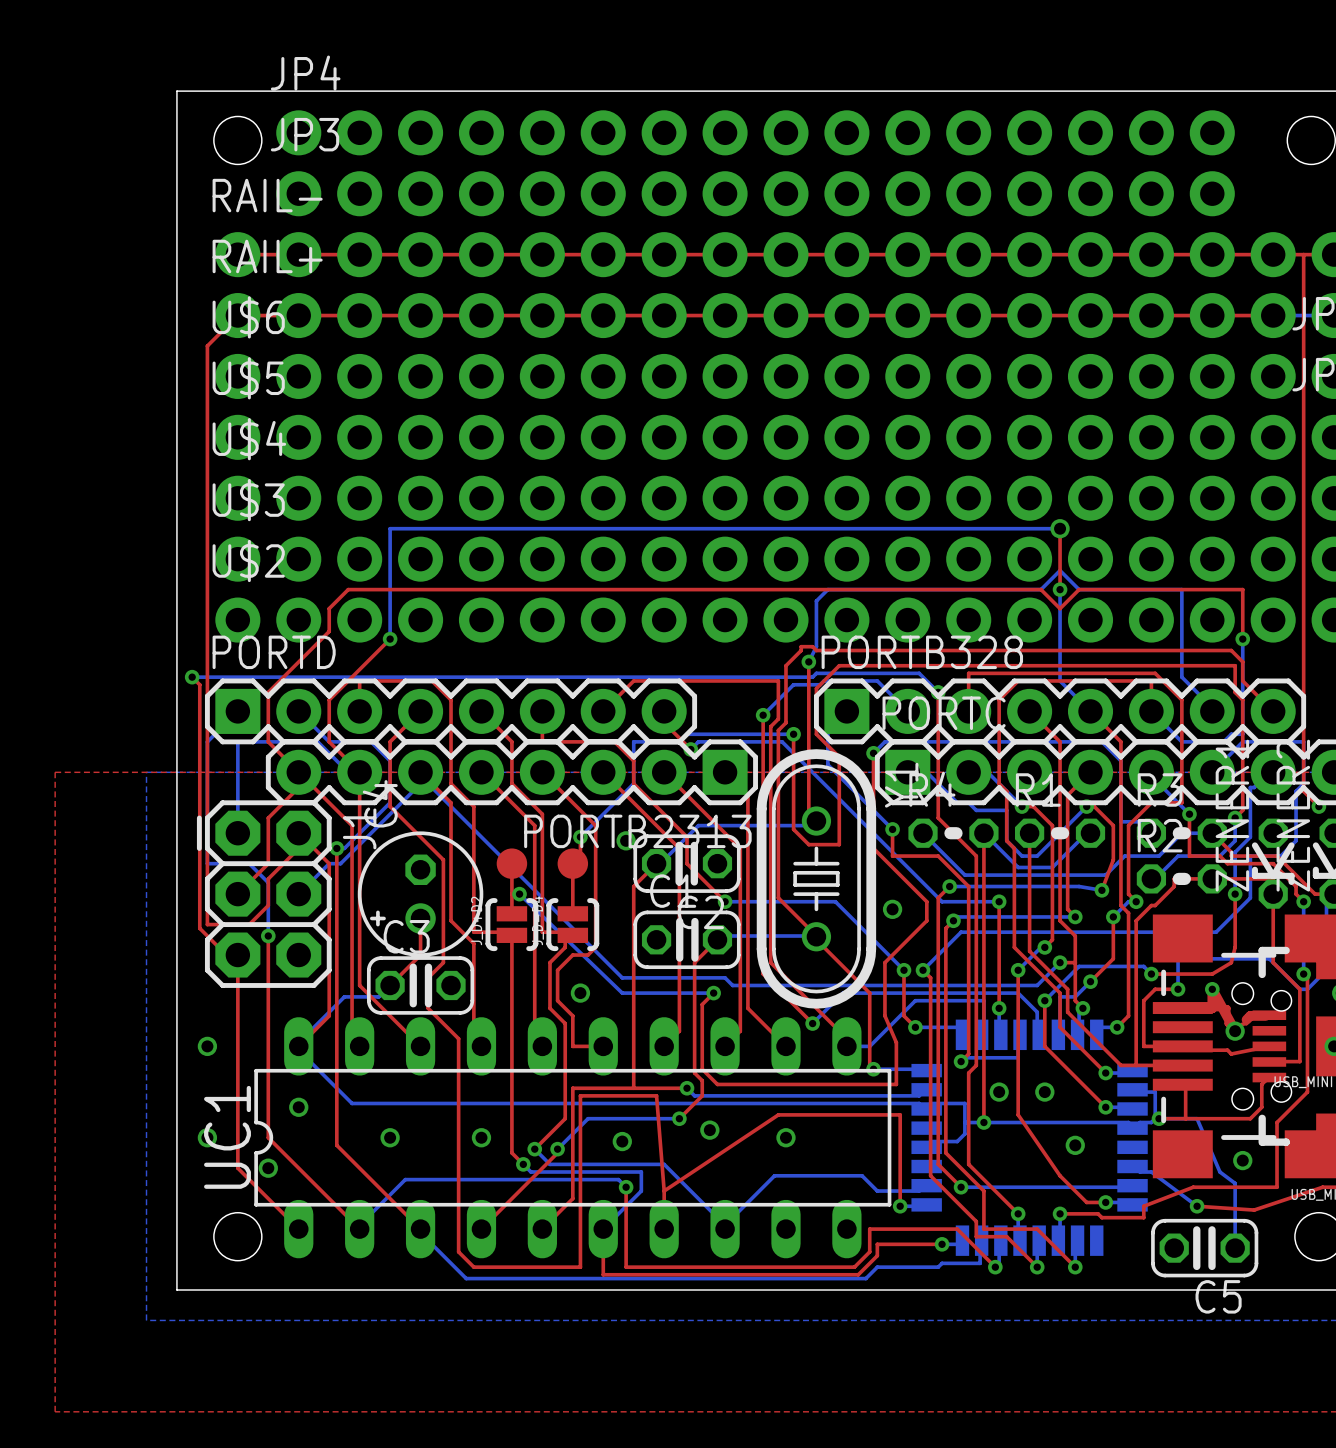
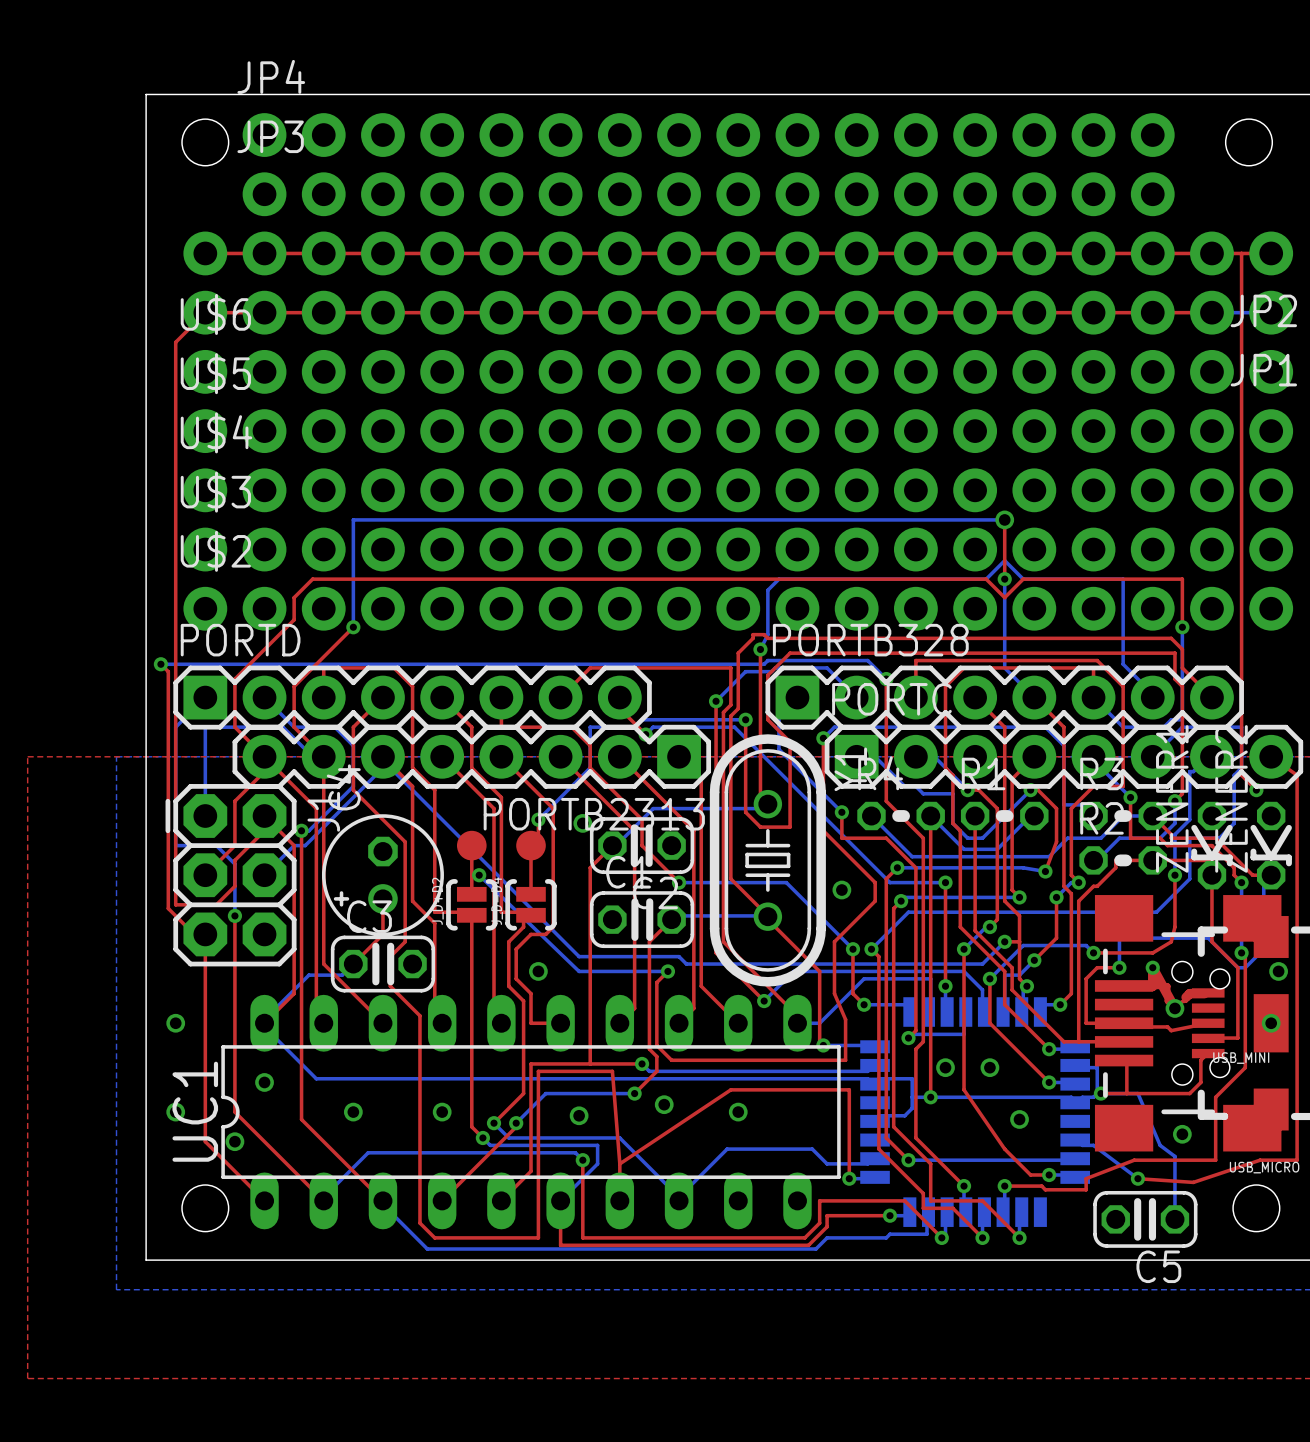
RAIL- name: RAIL- (267, 195) -> none
RAIL+ name: RAIL+ (267, 256) -> none

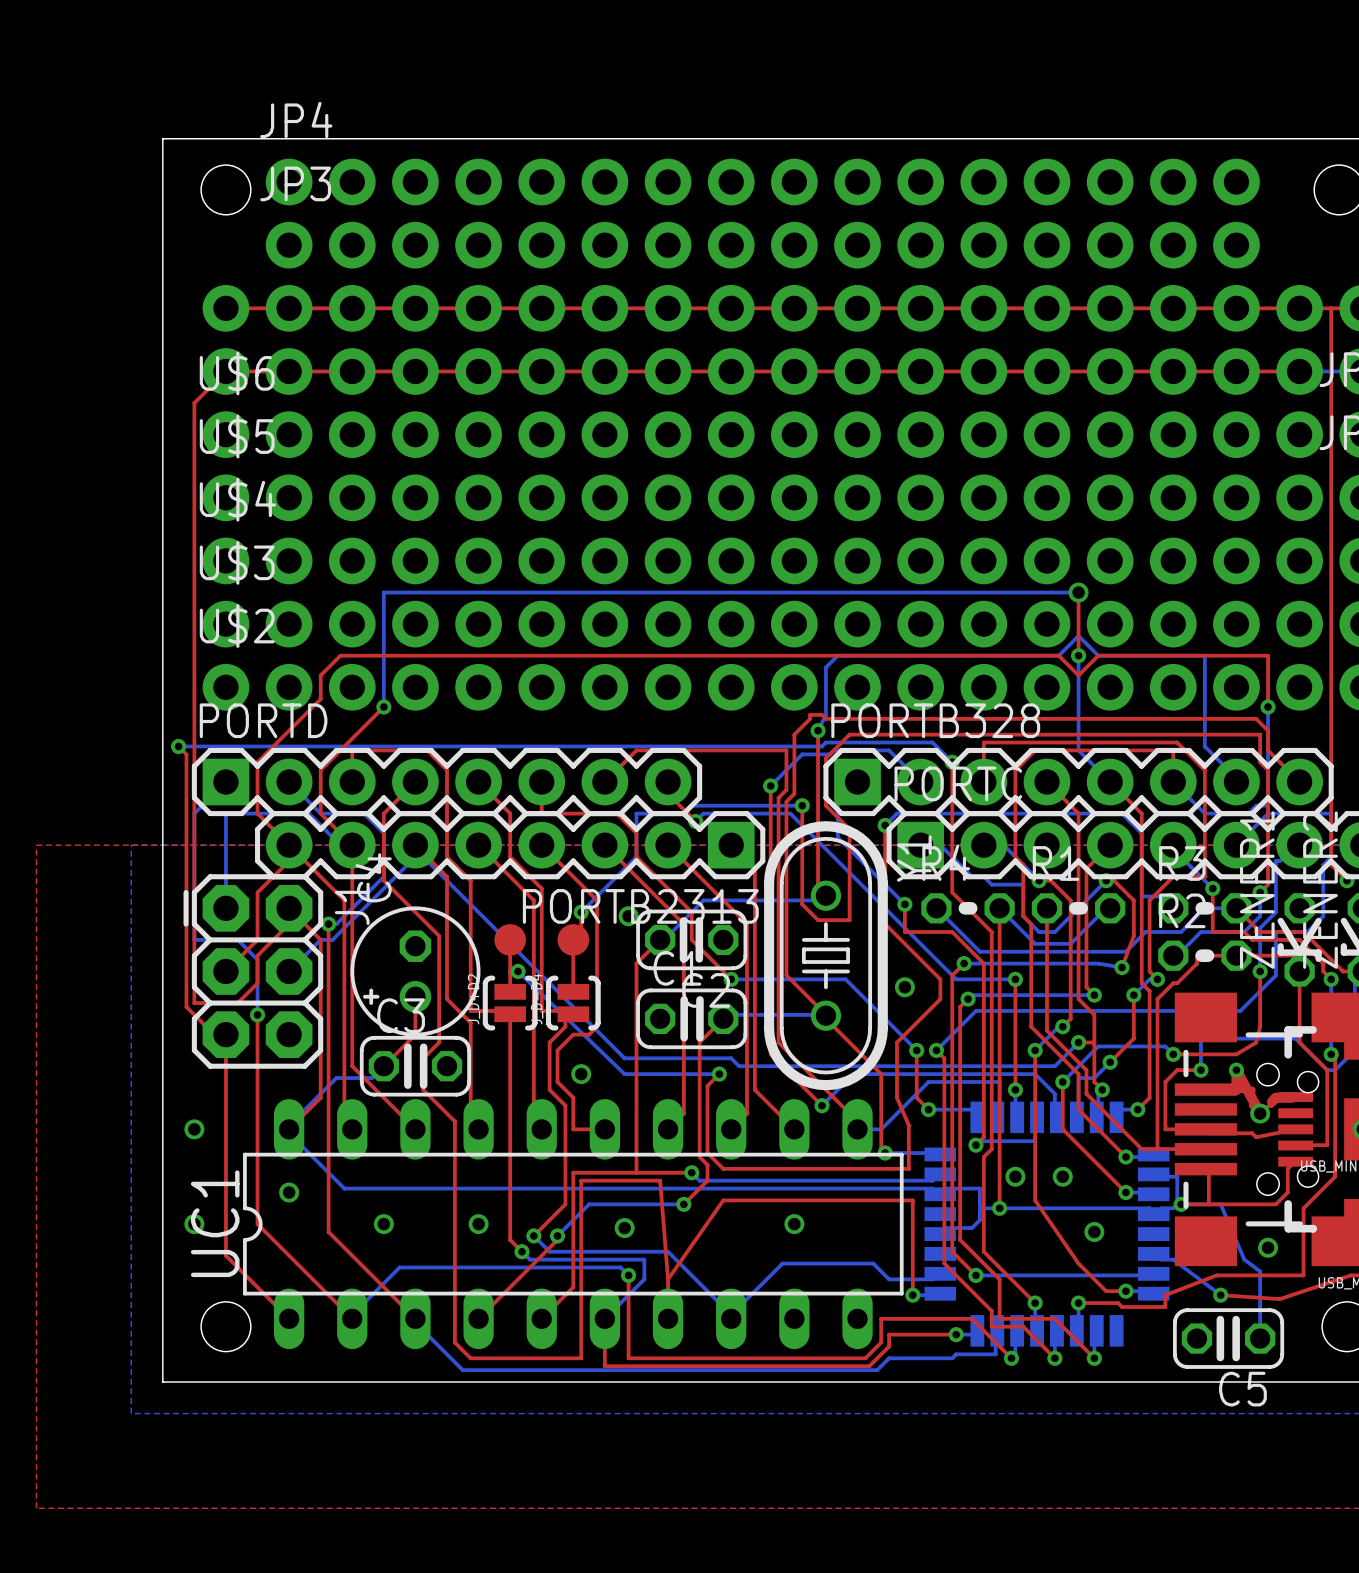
top track: (730, 1089) (619, 1163) -> (786, 1200) (723, 1200) (668, 1279)
via: (664, 1104) -> none
via: (234, 1141) -> none

